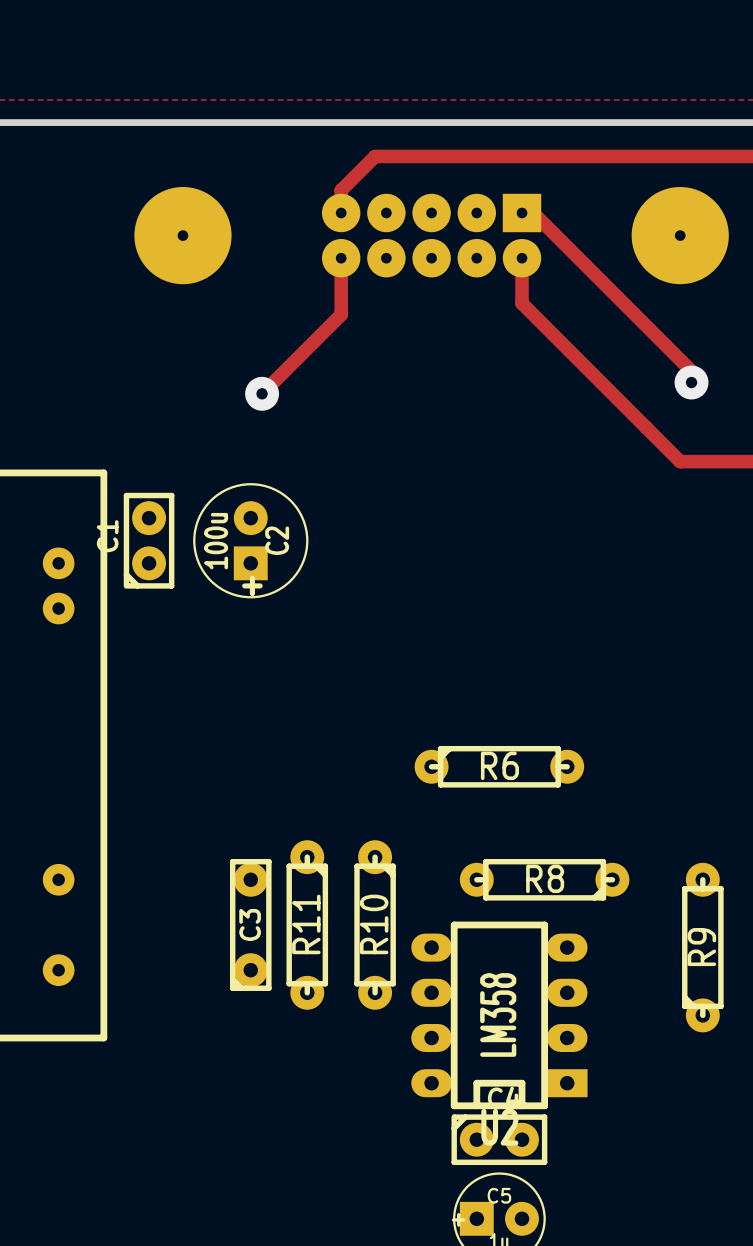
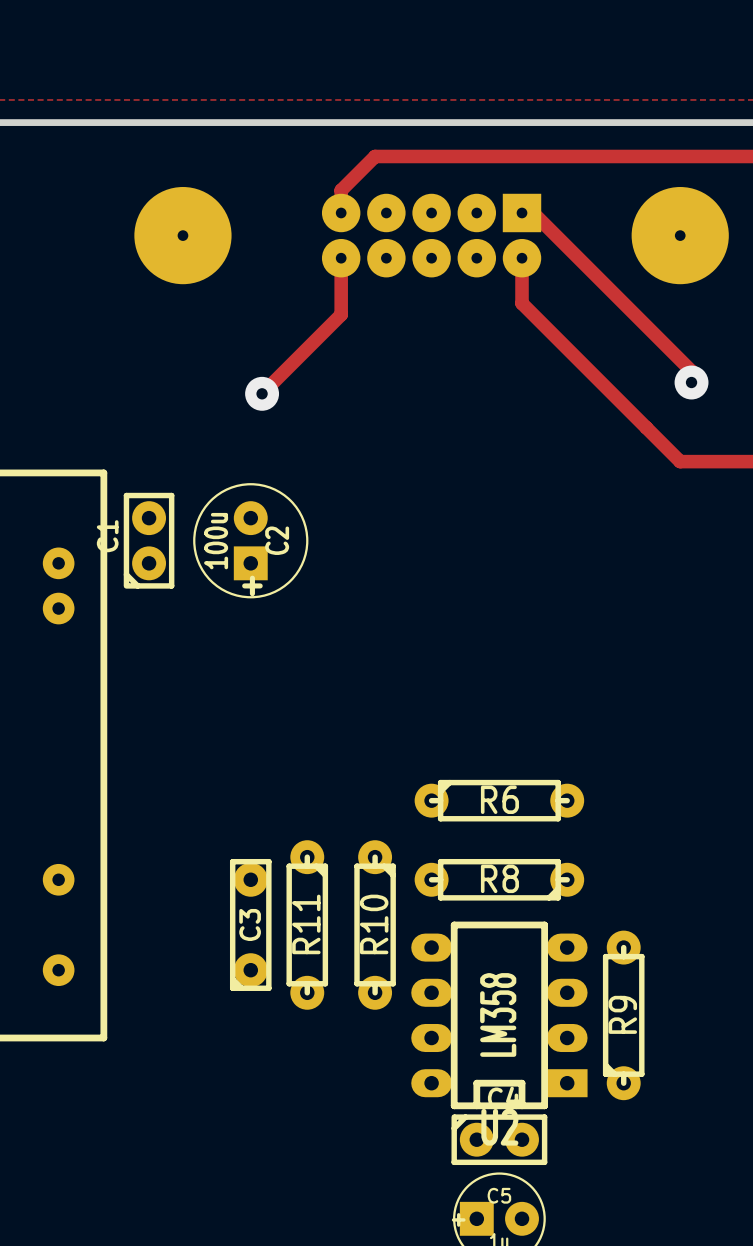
R6 position: (499, 766) -> (499, 800)
R8 position: (544, 879) -> (499, 879)
R9 position: (702, 947) -> (623, 1015)

